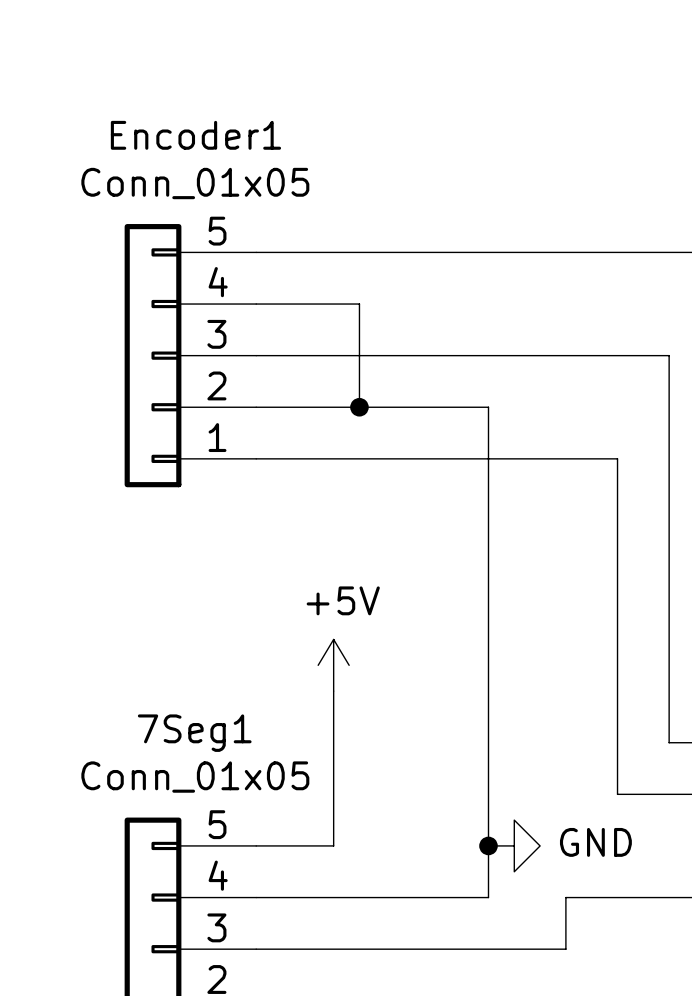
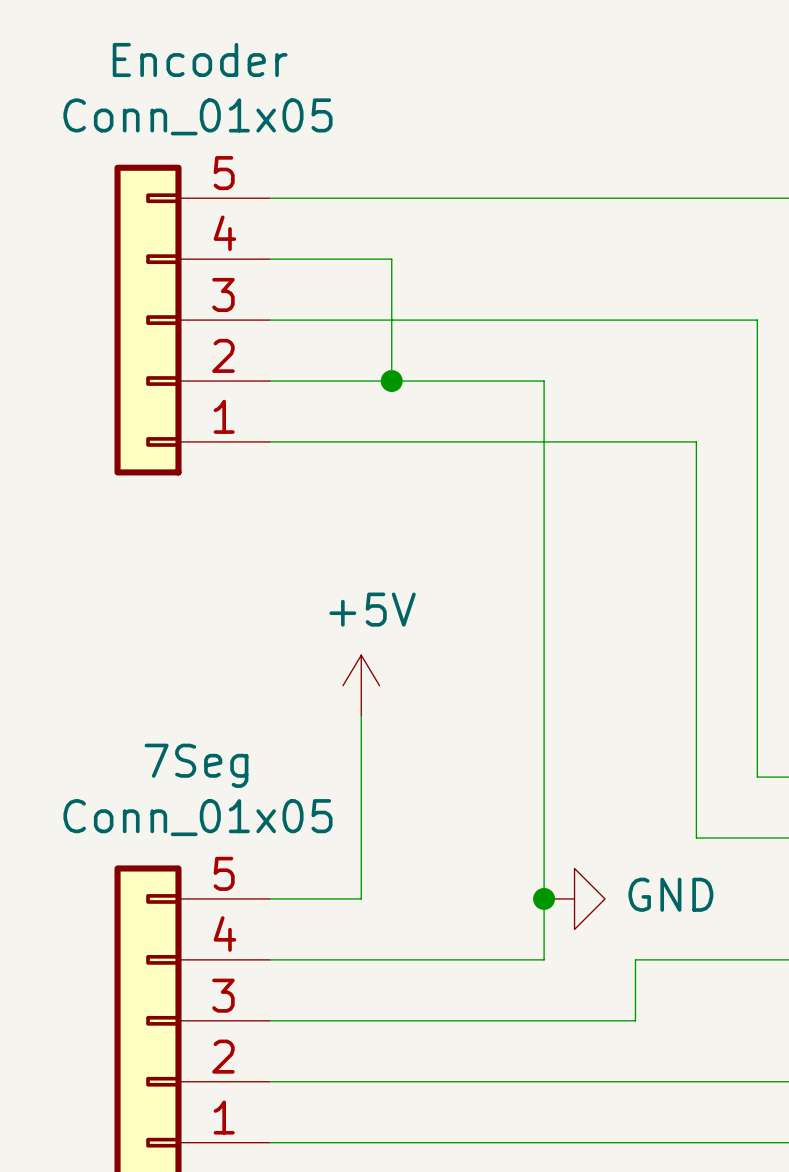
Encoder1 name: Encoder1 (195, 135) -> Encoder (200, 59)
7Seg1 name: 7Seg1 (194, 733) -> 7Seg (196, 765)

